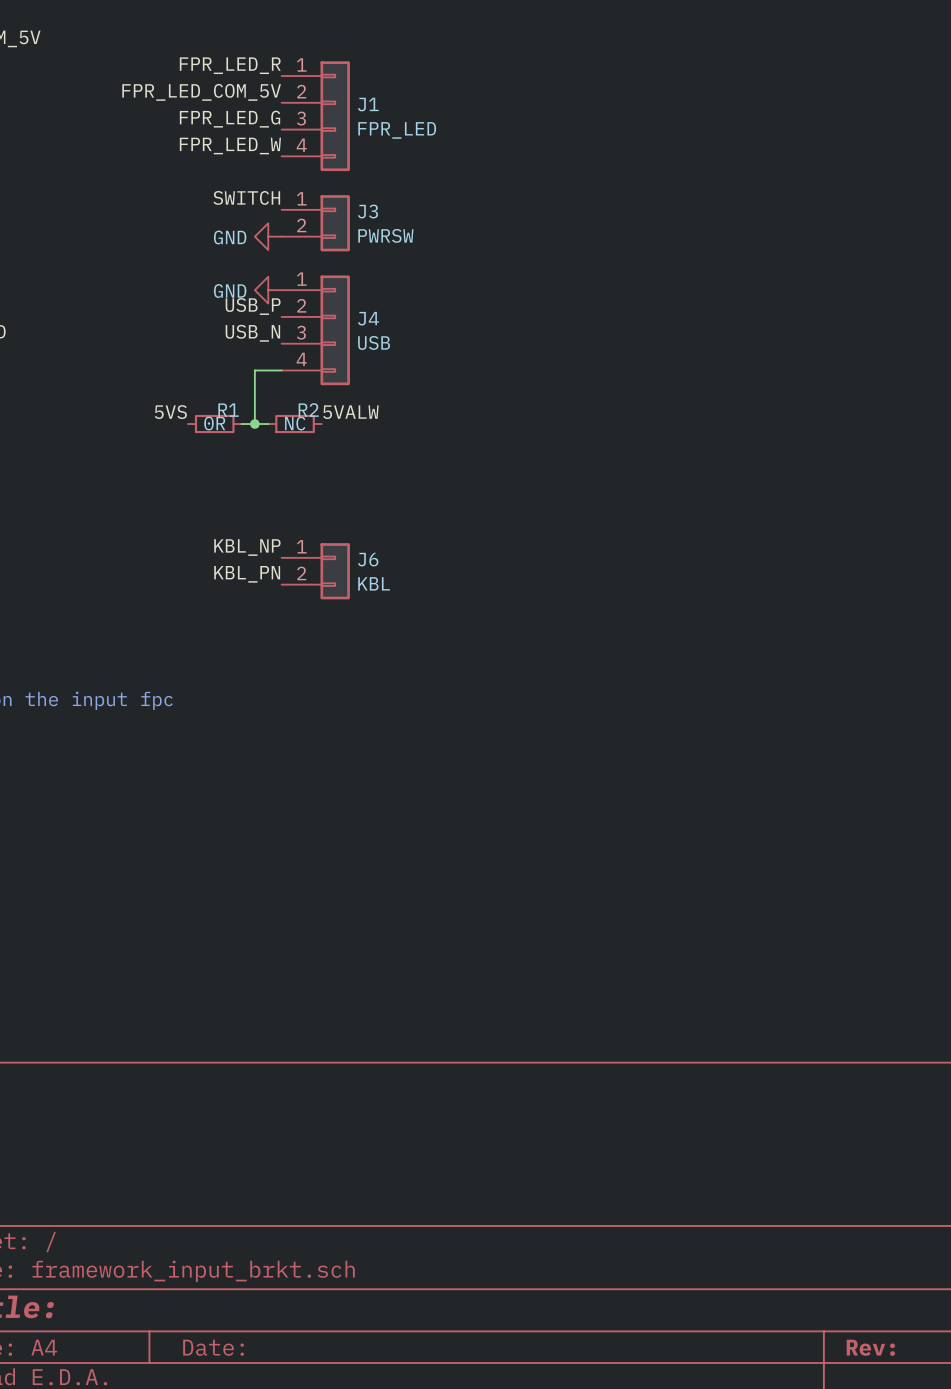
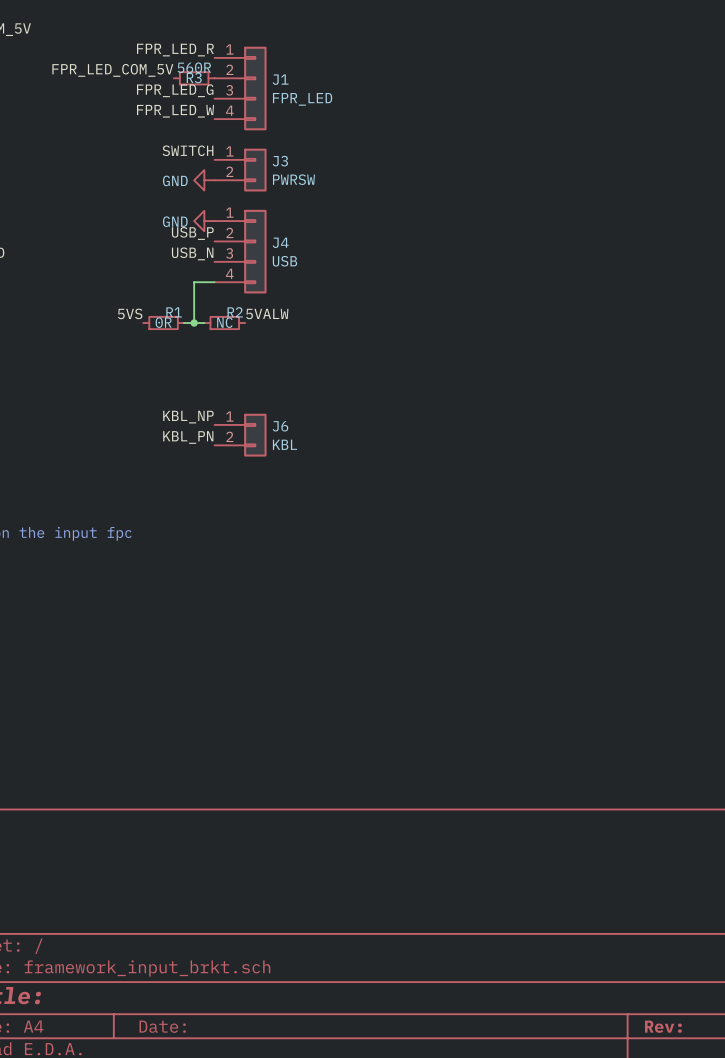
label position: FPR_LED_COM_5V (201, 92) -> FPR_LED_COM_5V (112, 70)
R3: none -> 560R (194, 78)

